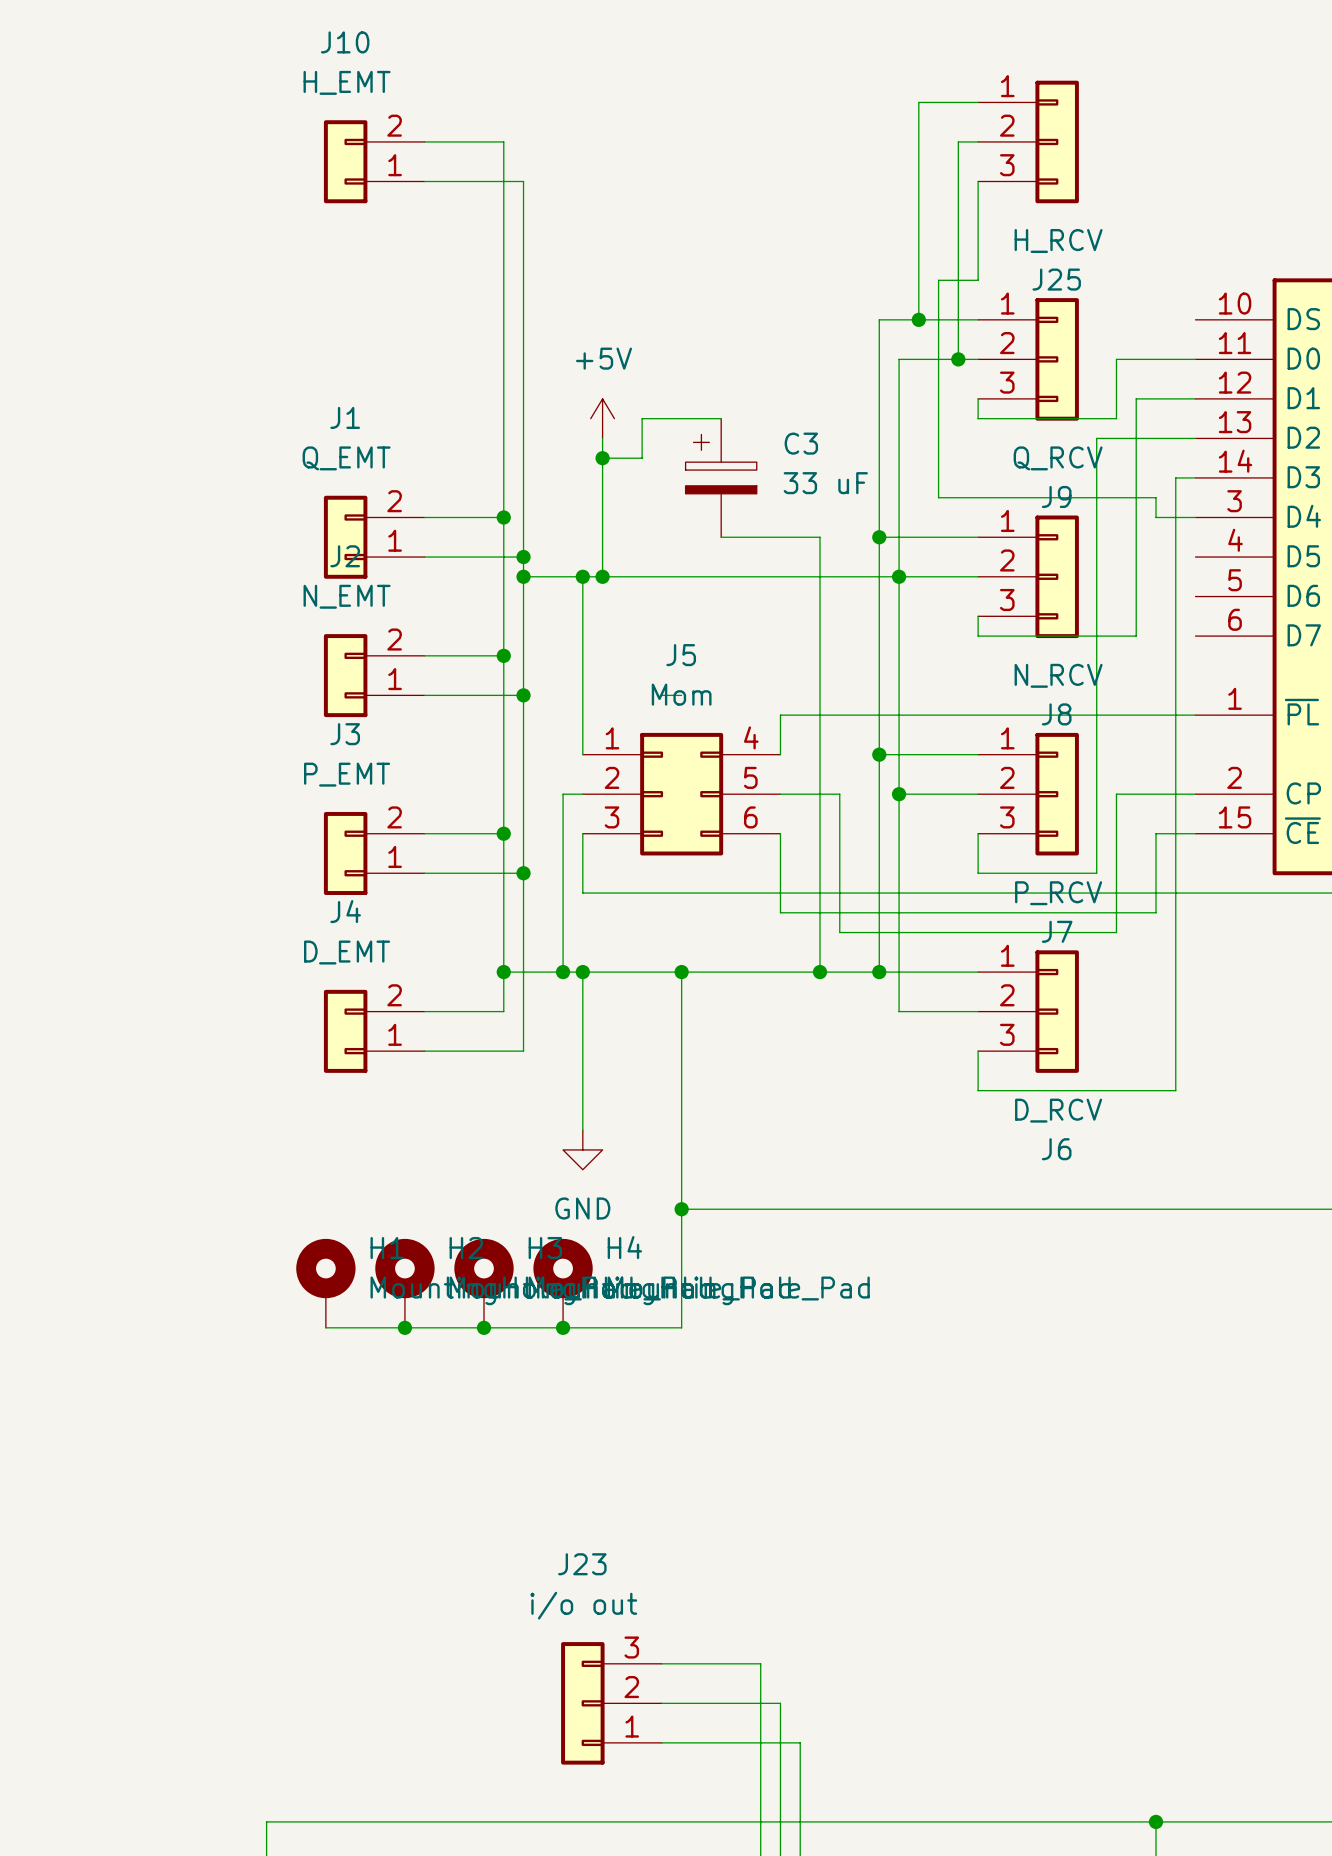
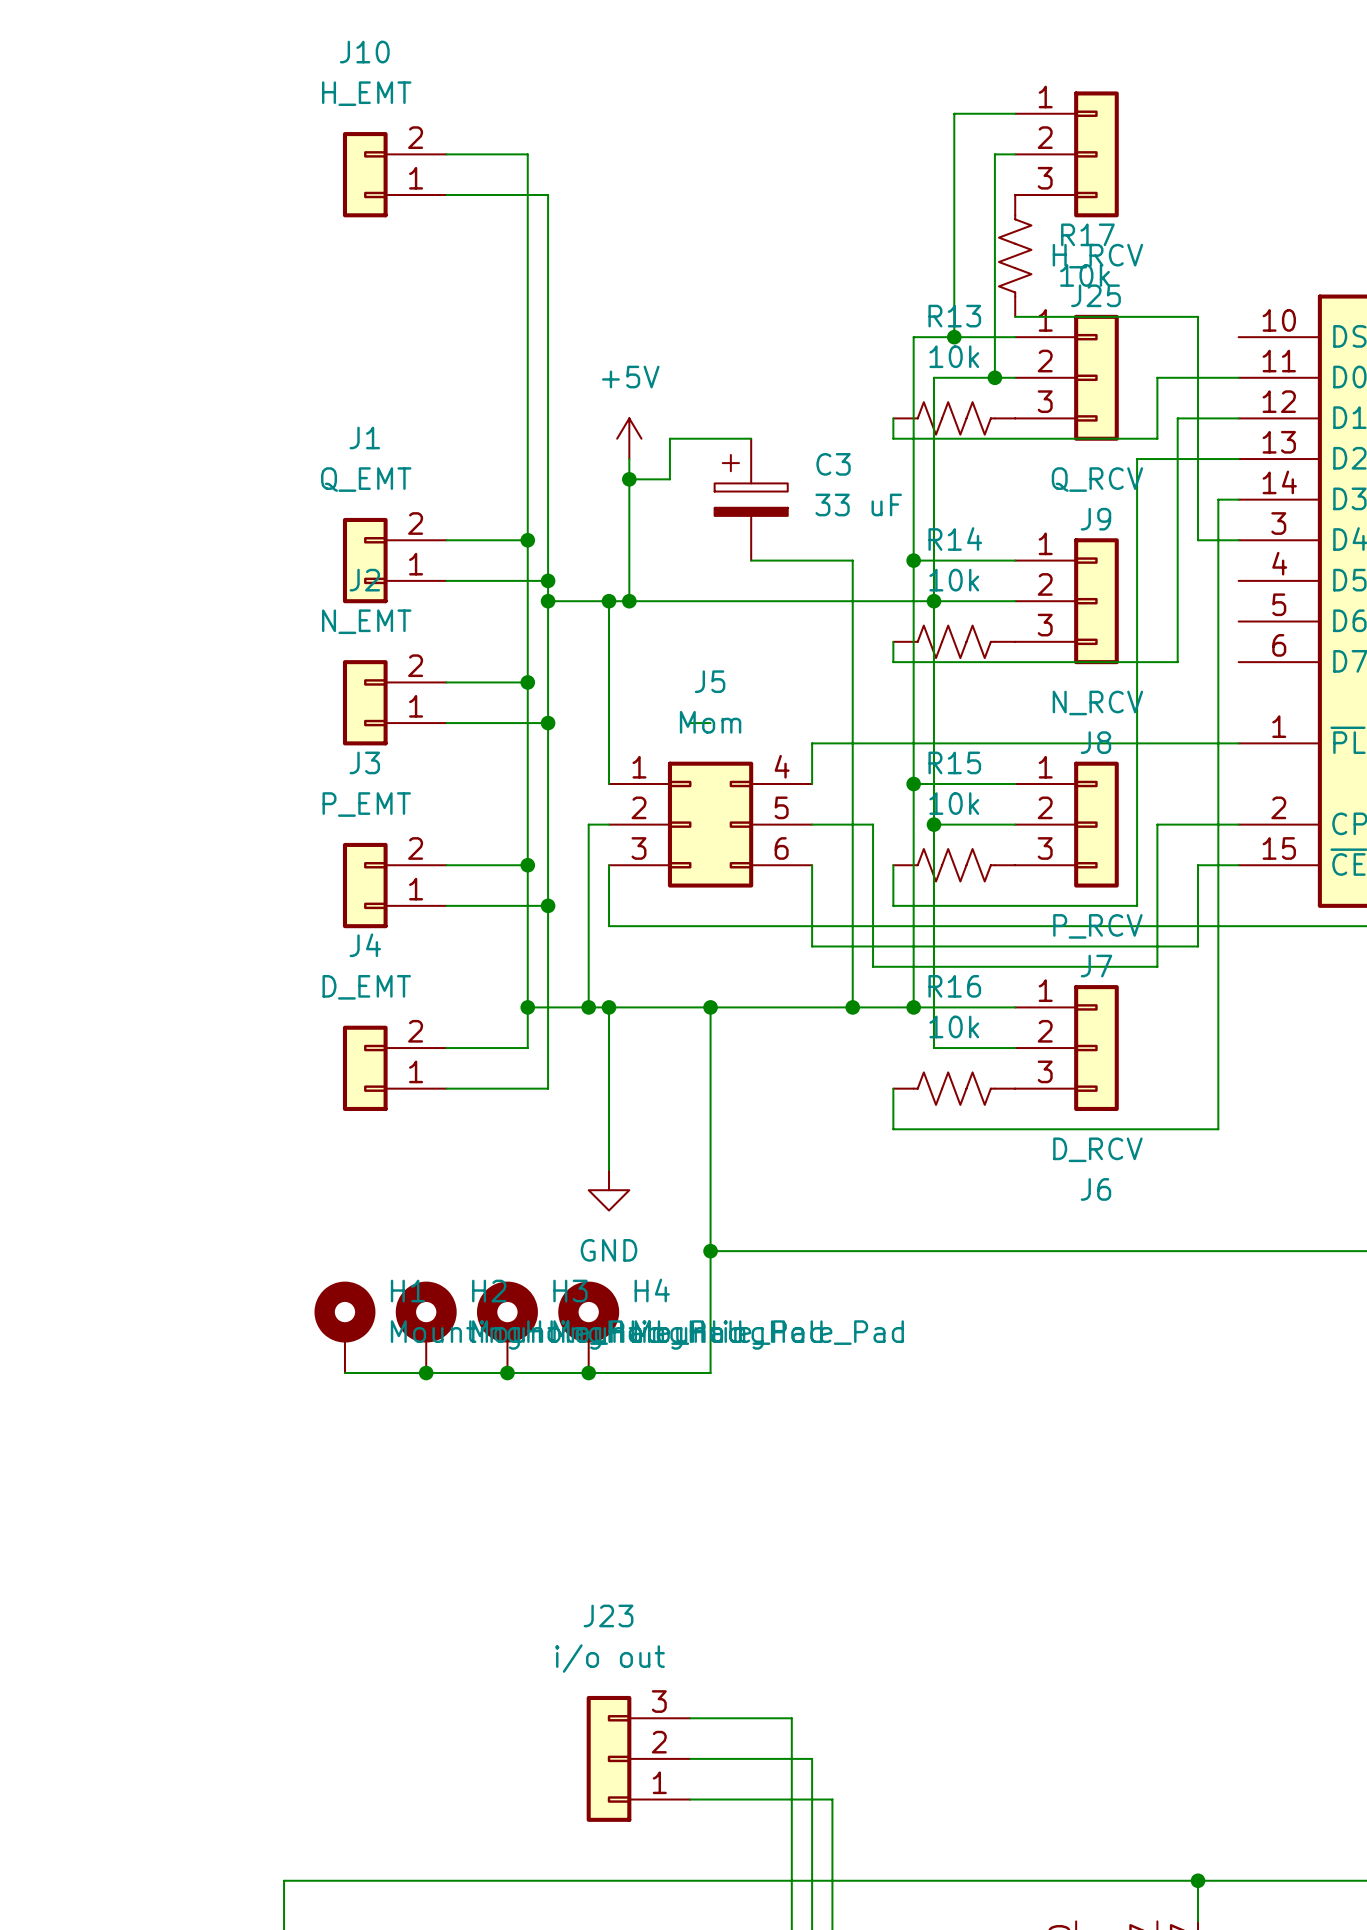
wire: (978, 181) (978, 280) (938, 280) (938, 497) (1155, 497) -> (1015, 316) (1198, 316) (1198, 519)
R17: none -> 10k (1015, 255)
R13: none -> 10k (954, 418)
wire: (978, 398) (978, 418) -> (893, 418) (893, 438) (1015, 438)
R14: none -> 10k (954, 641)
wire: (978, 616) (978, 636) -> (893, 641) (893, 662) (1015, 662)
R15: none -> 10k (954, 865)
wire: (978, 833) (978, 873) -> (893, 865) (893, 905) (1015, 905)
R16: none -> 10k (954, 1088)
wire: (978, 1051) (978, 1090) -> (893, 1088) (893, 1129) (1015, 1129)

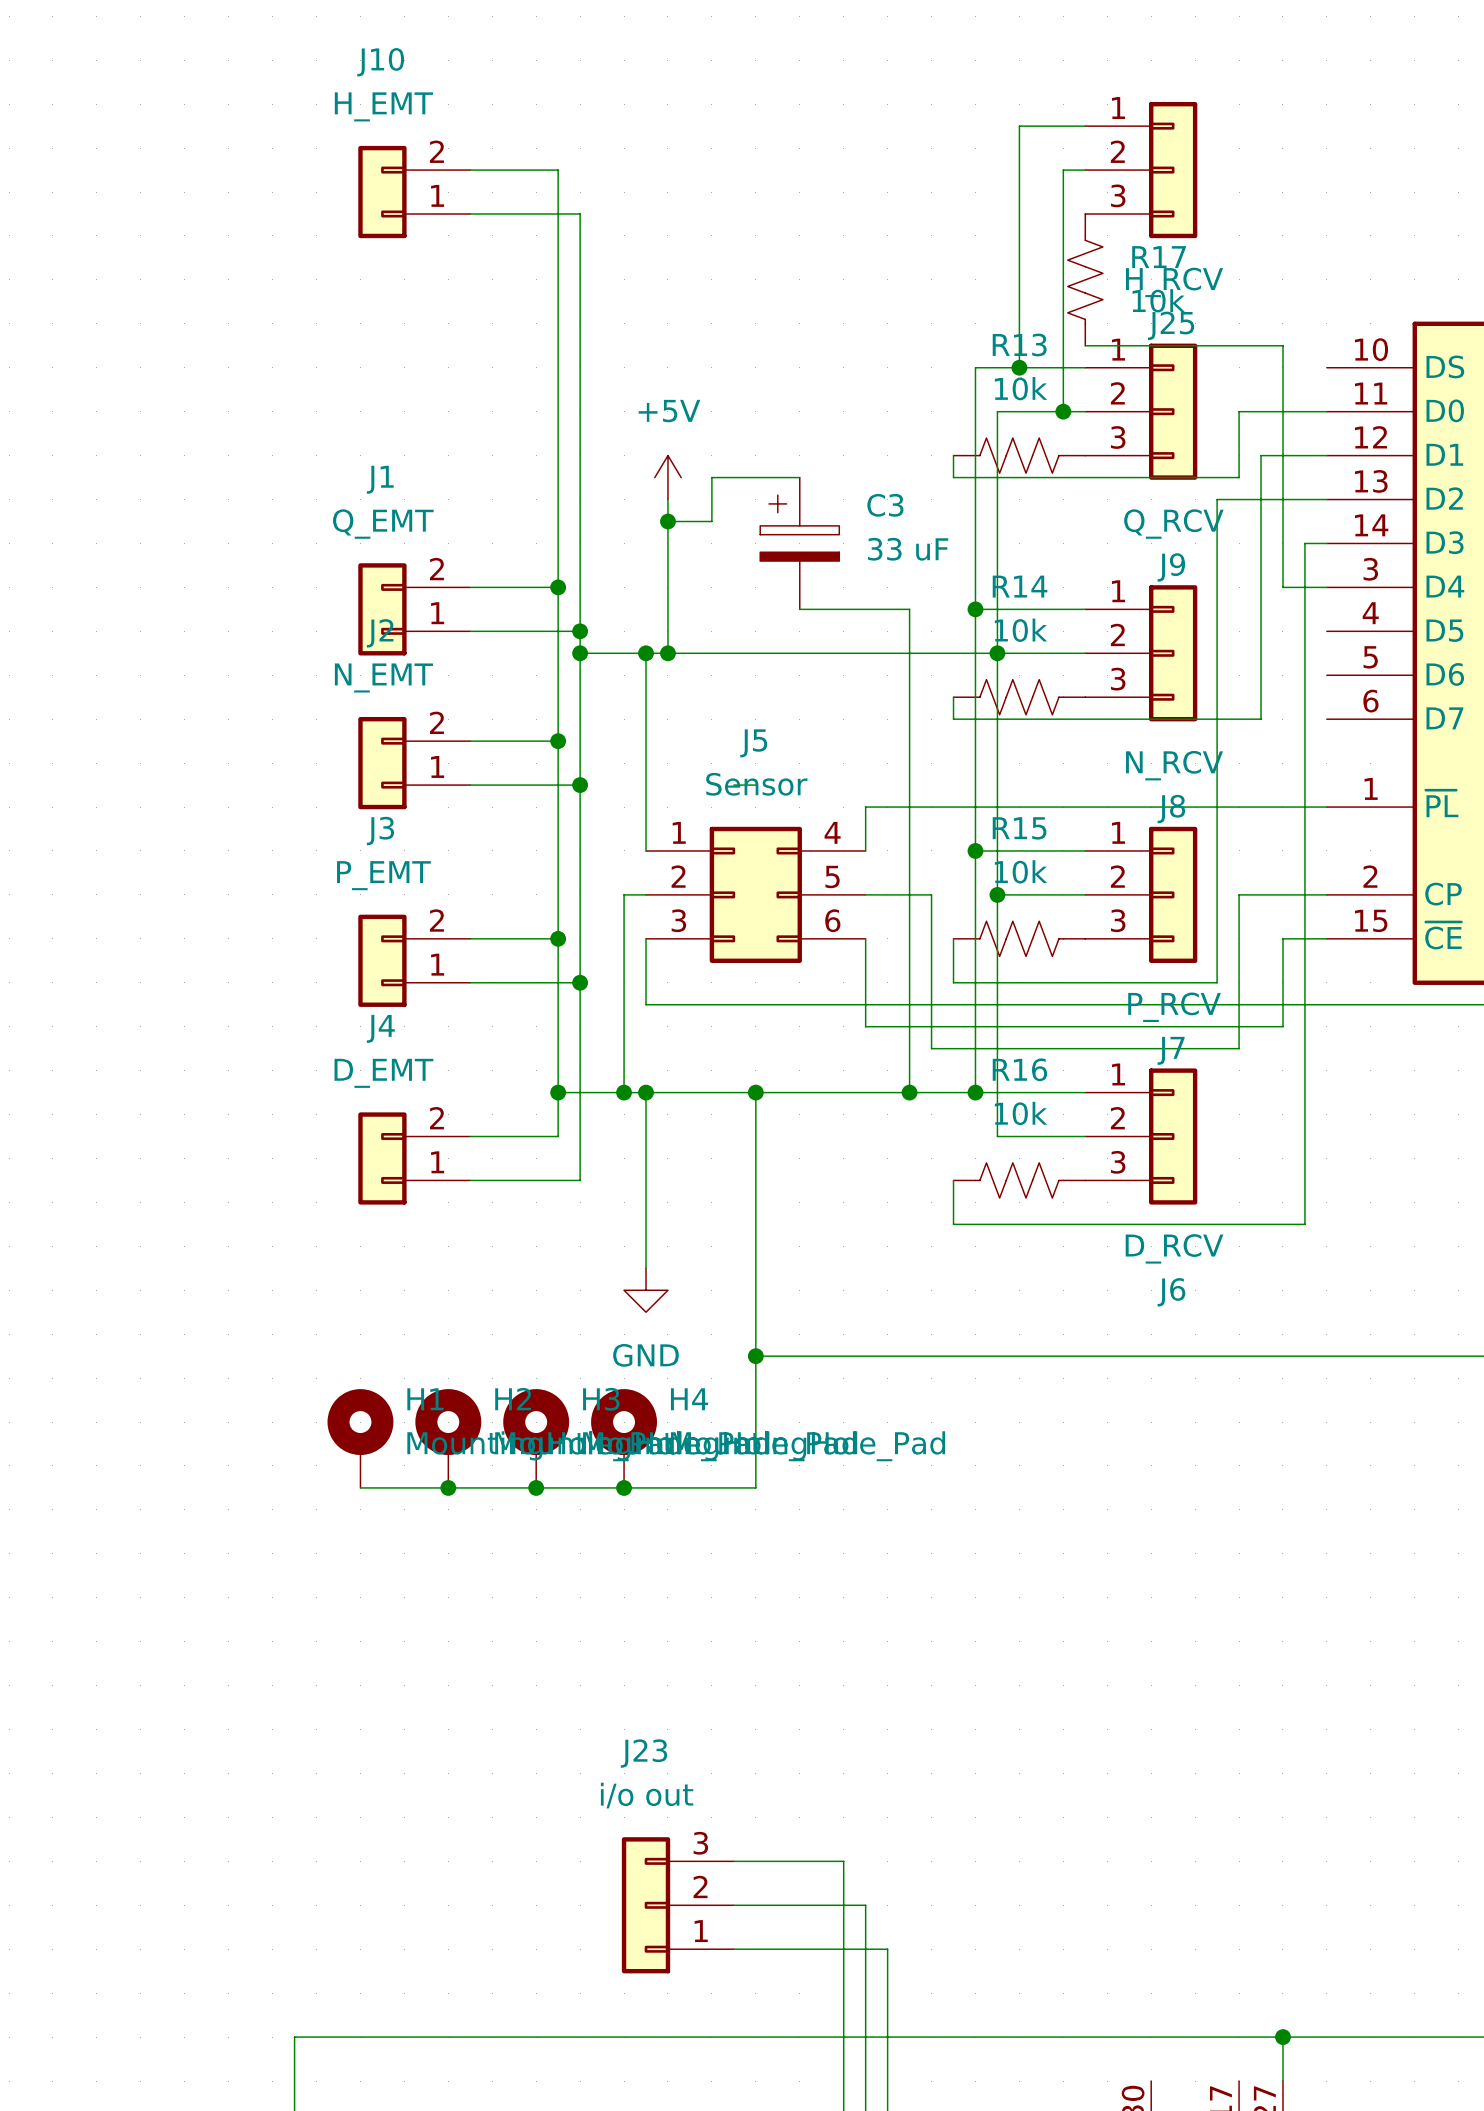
J5 value: Mom (710, 722) -> Sensor (756, 784)

